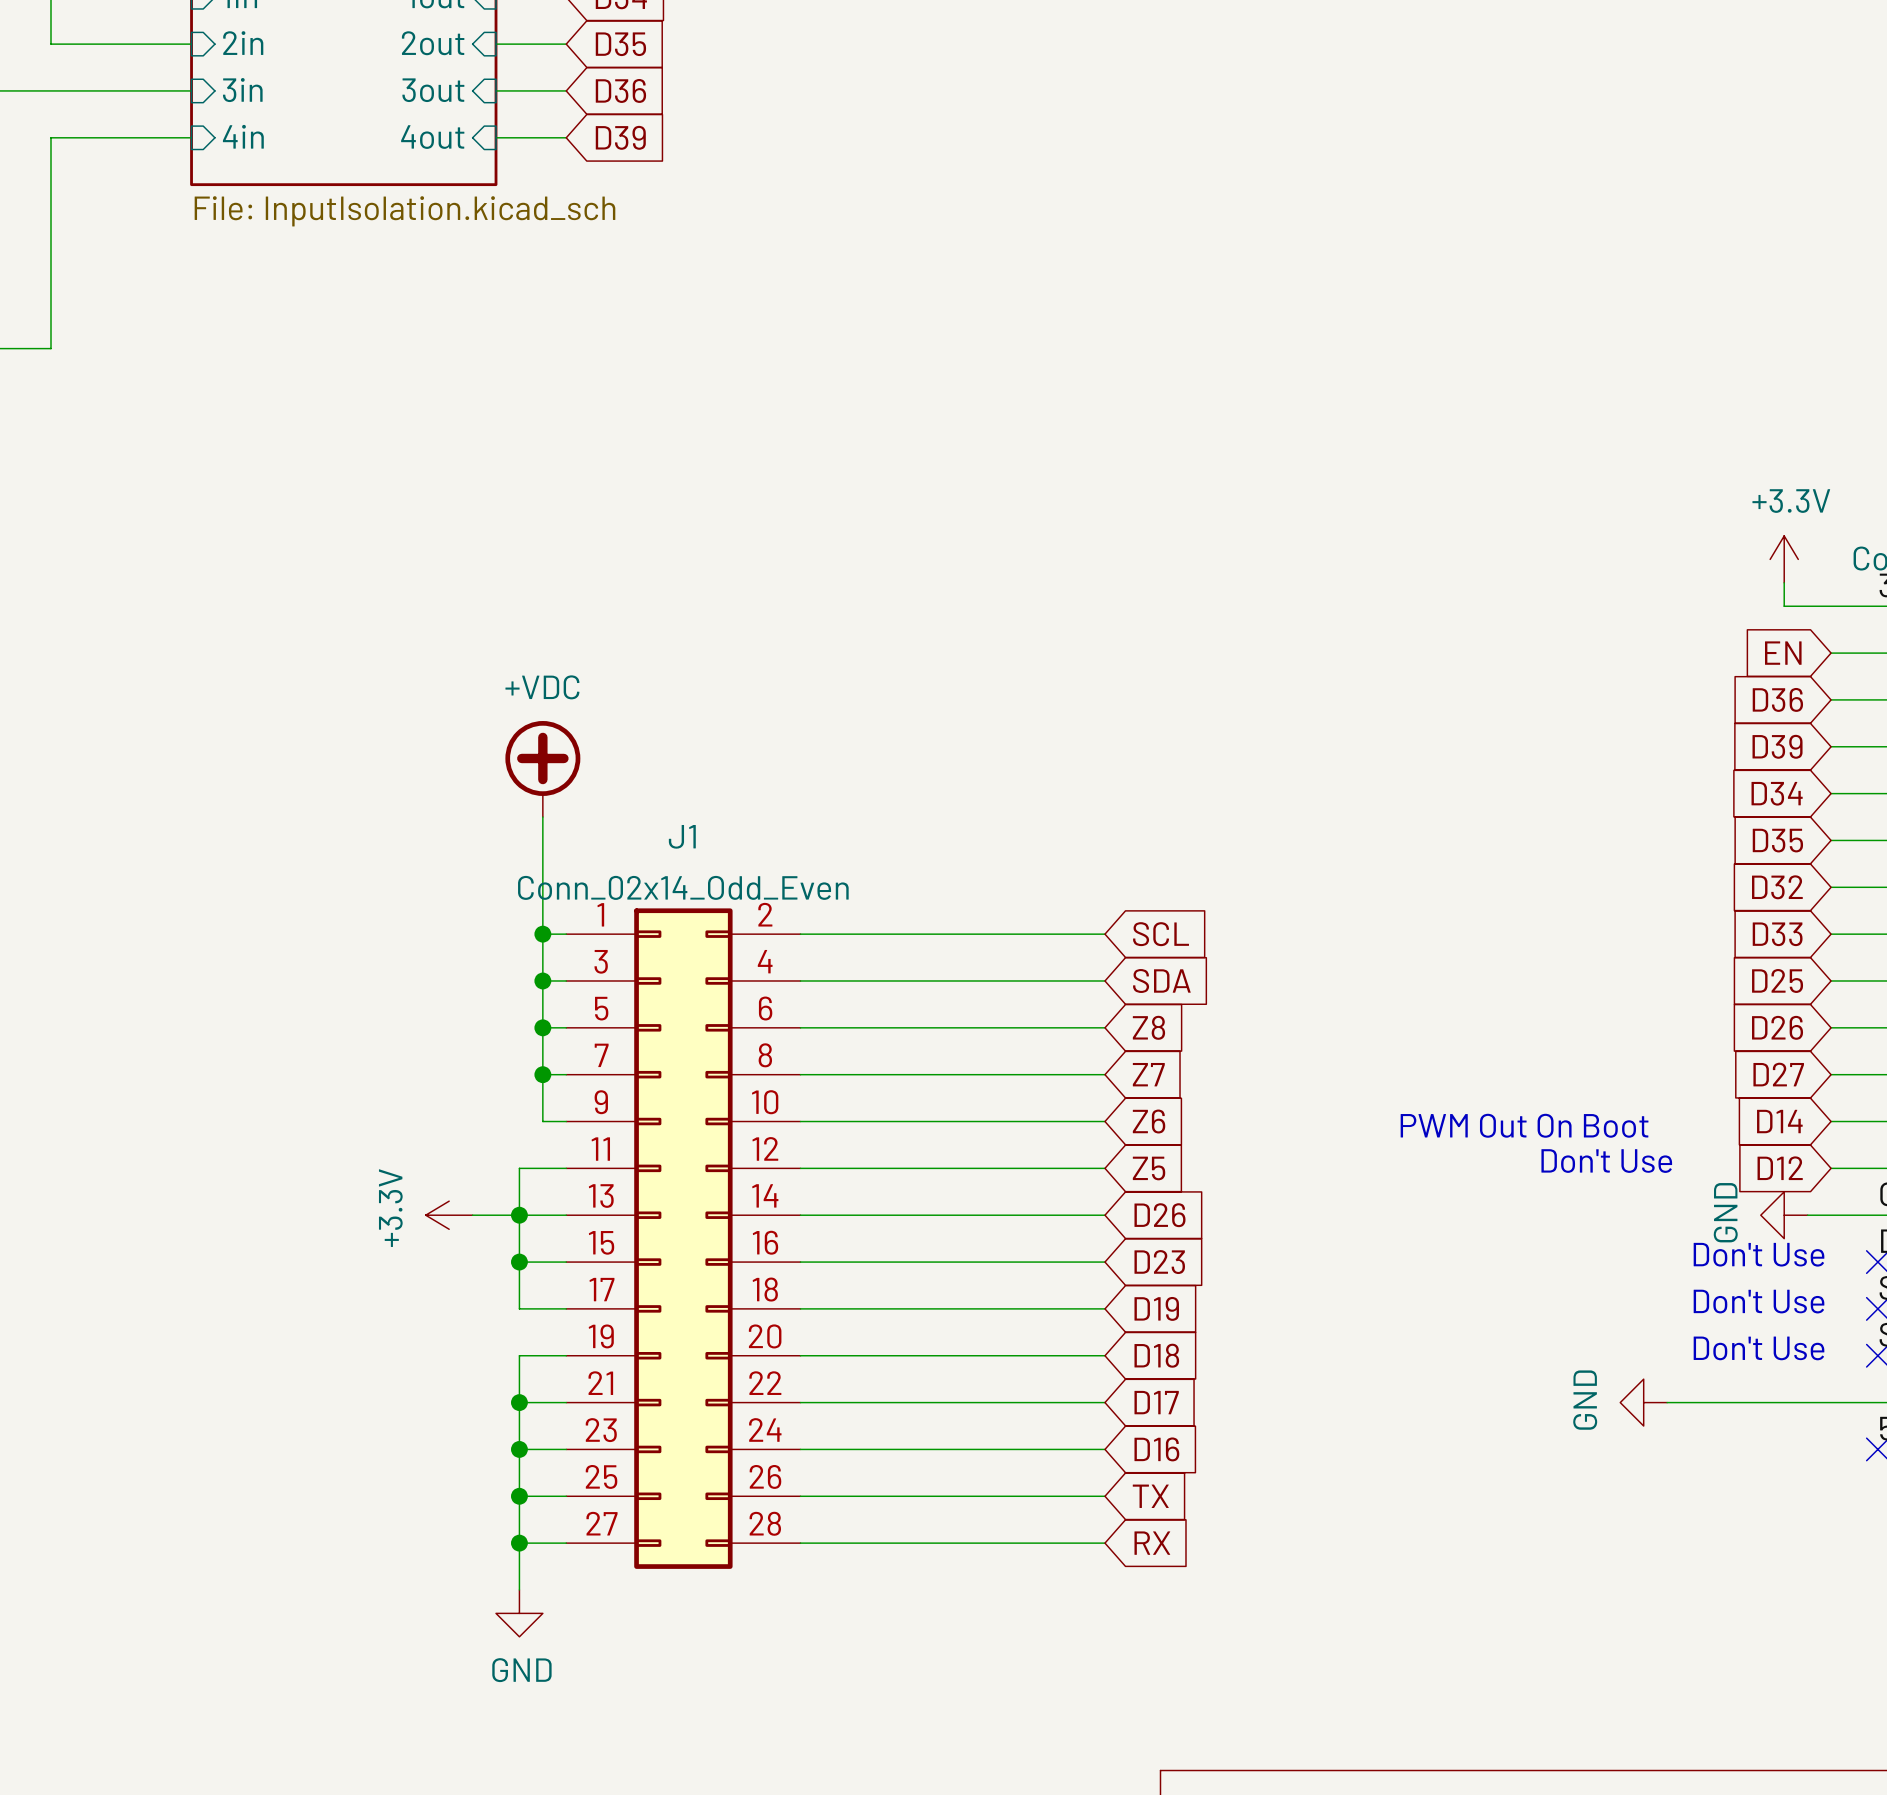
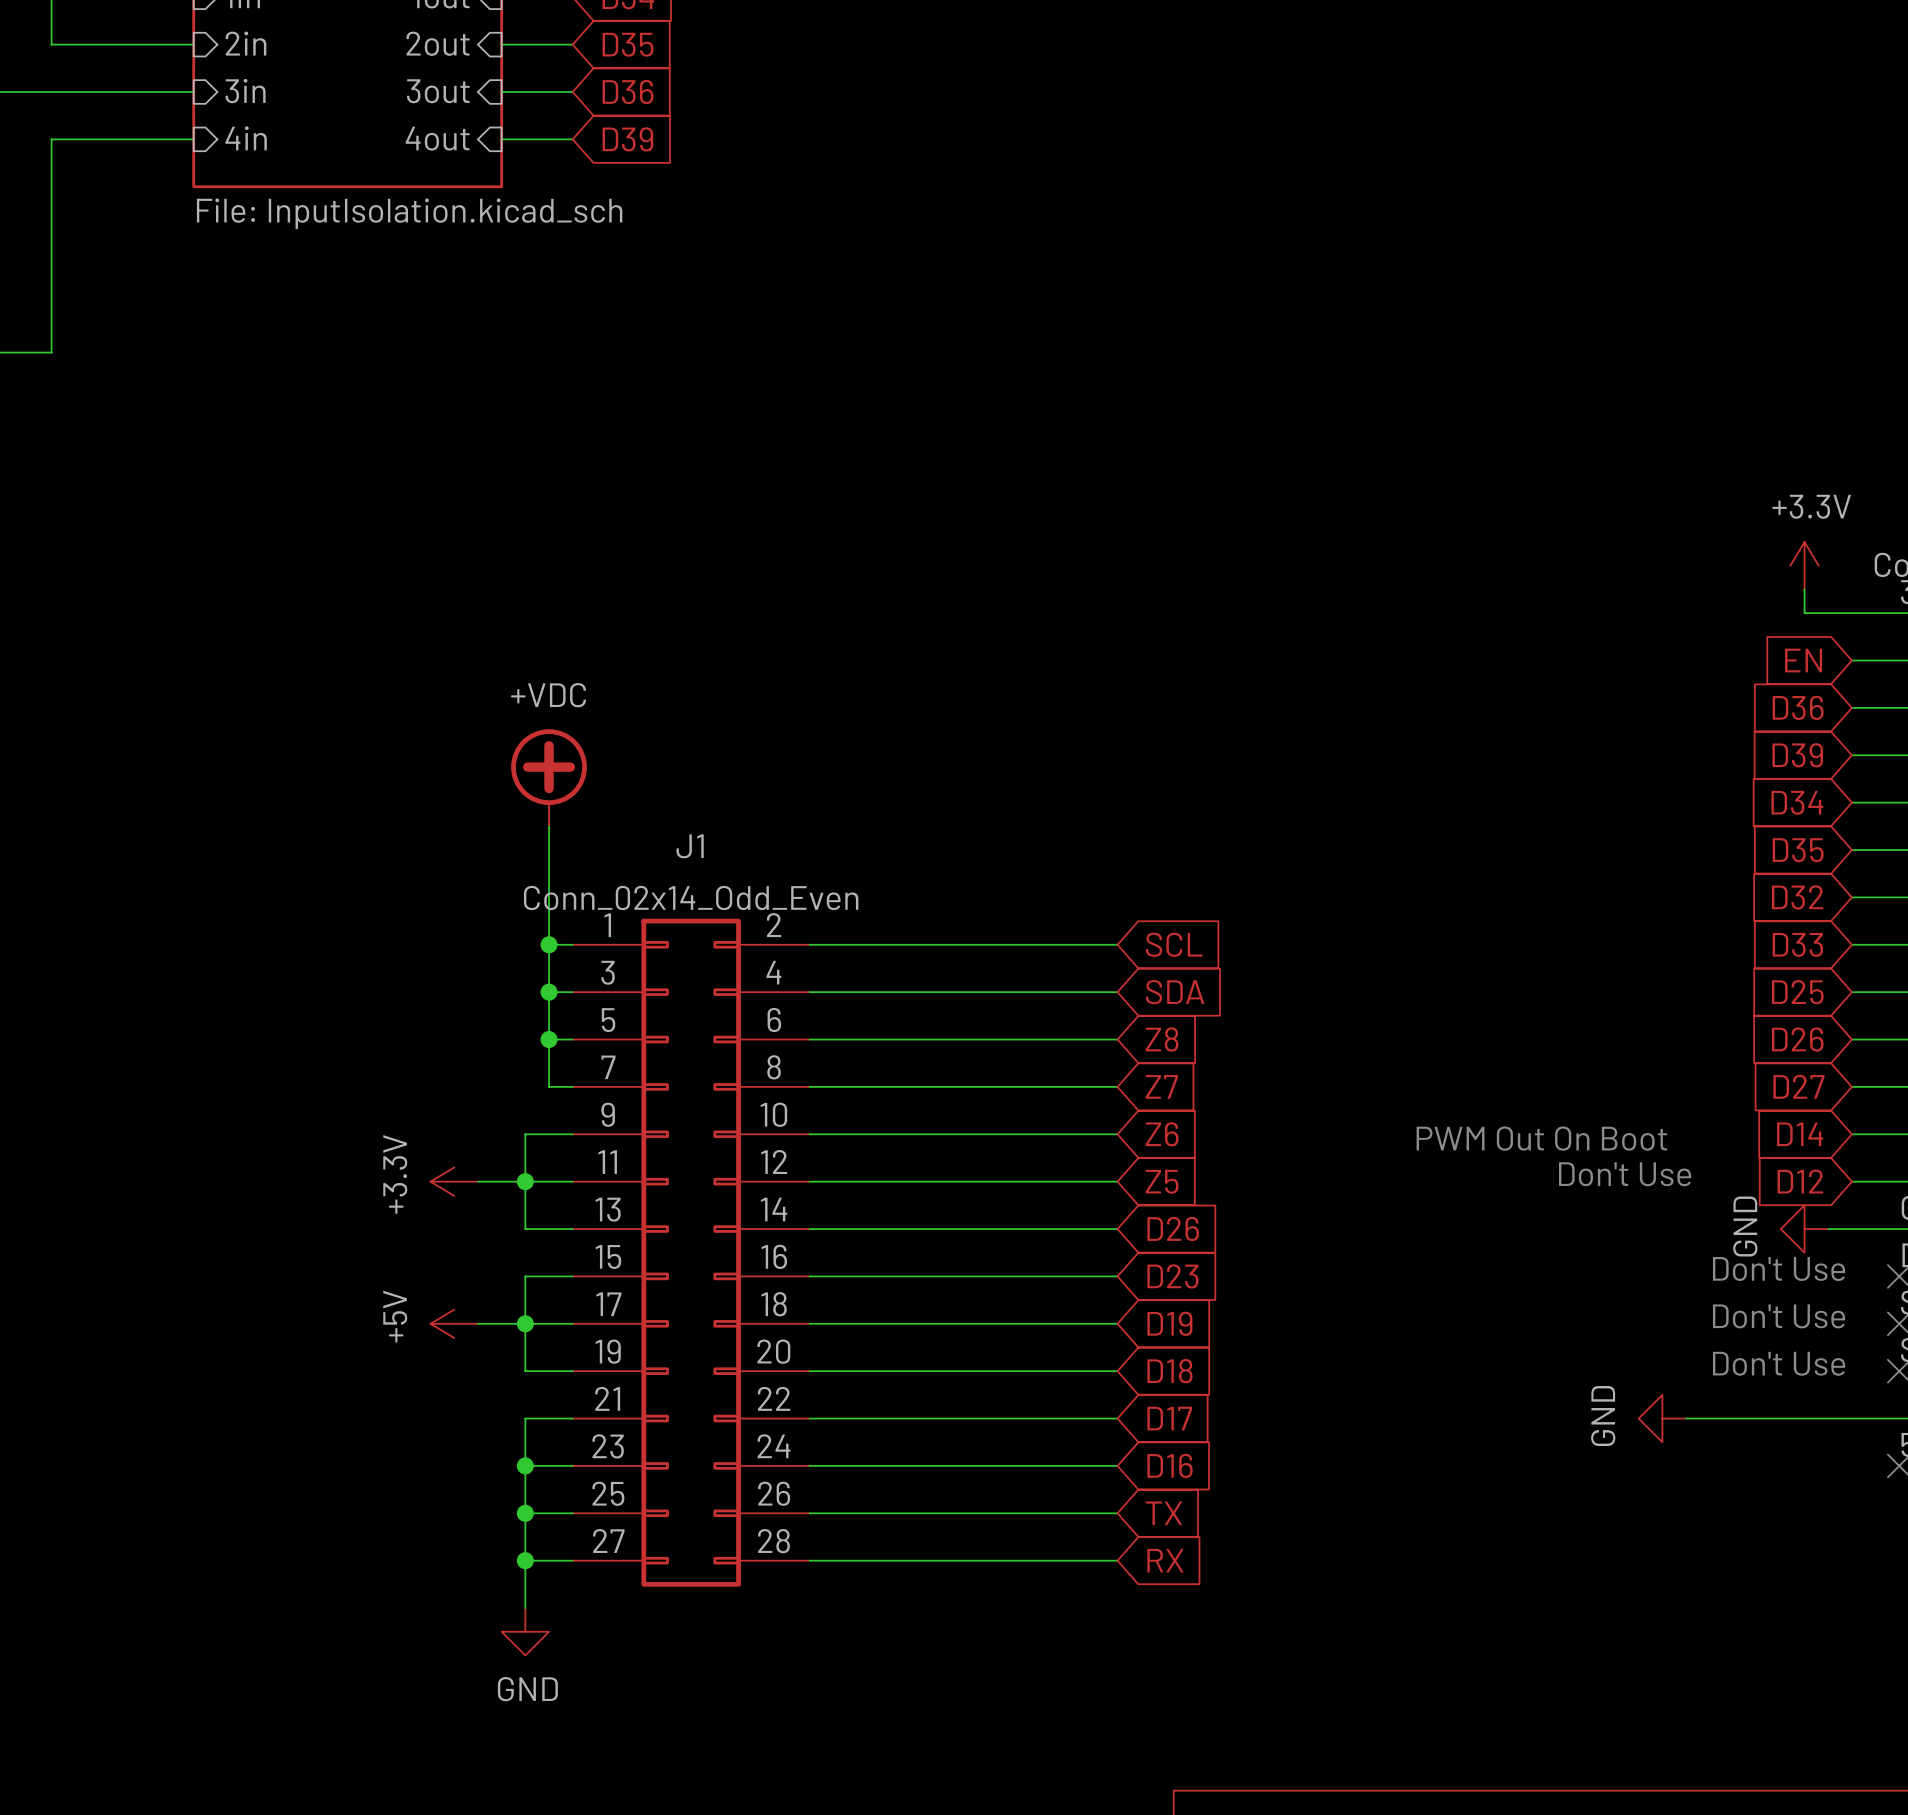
wire: (542, 1074) (542, 1121) -> (477, 1181) (525, 1181) (525, 1134) (549, 1134)
junction: (542, 1074) -> none
junction: none -> (525, 1181)
power symbol position: +3.3V (449, 1215) -> +3.3V (454, 1181)
wire: (472, 1215) (519, 1215) (519, 1262) -> none
junction: (519, 1215) -> none
junction: (519, 1262) -> none
power symbol: none -> +5V (454, 1323)
junction: none -> (525, 1323)
wire: (519, 1355) (519, 1402) -> (525, 1371) (525, 1323) (477, 1323)
junction: (519, 1402) -> none

